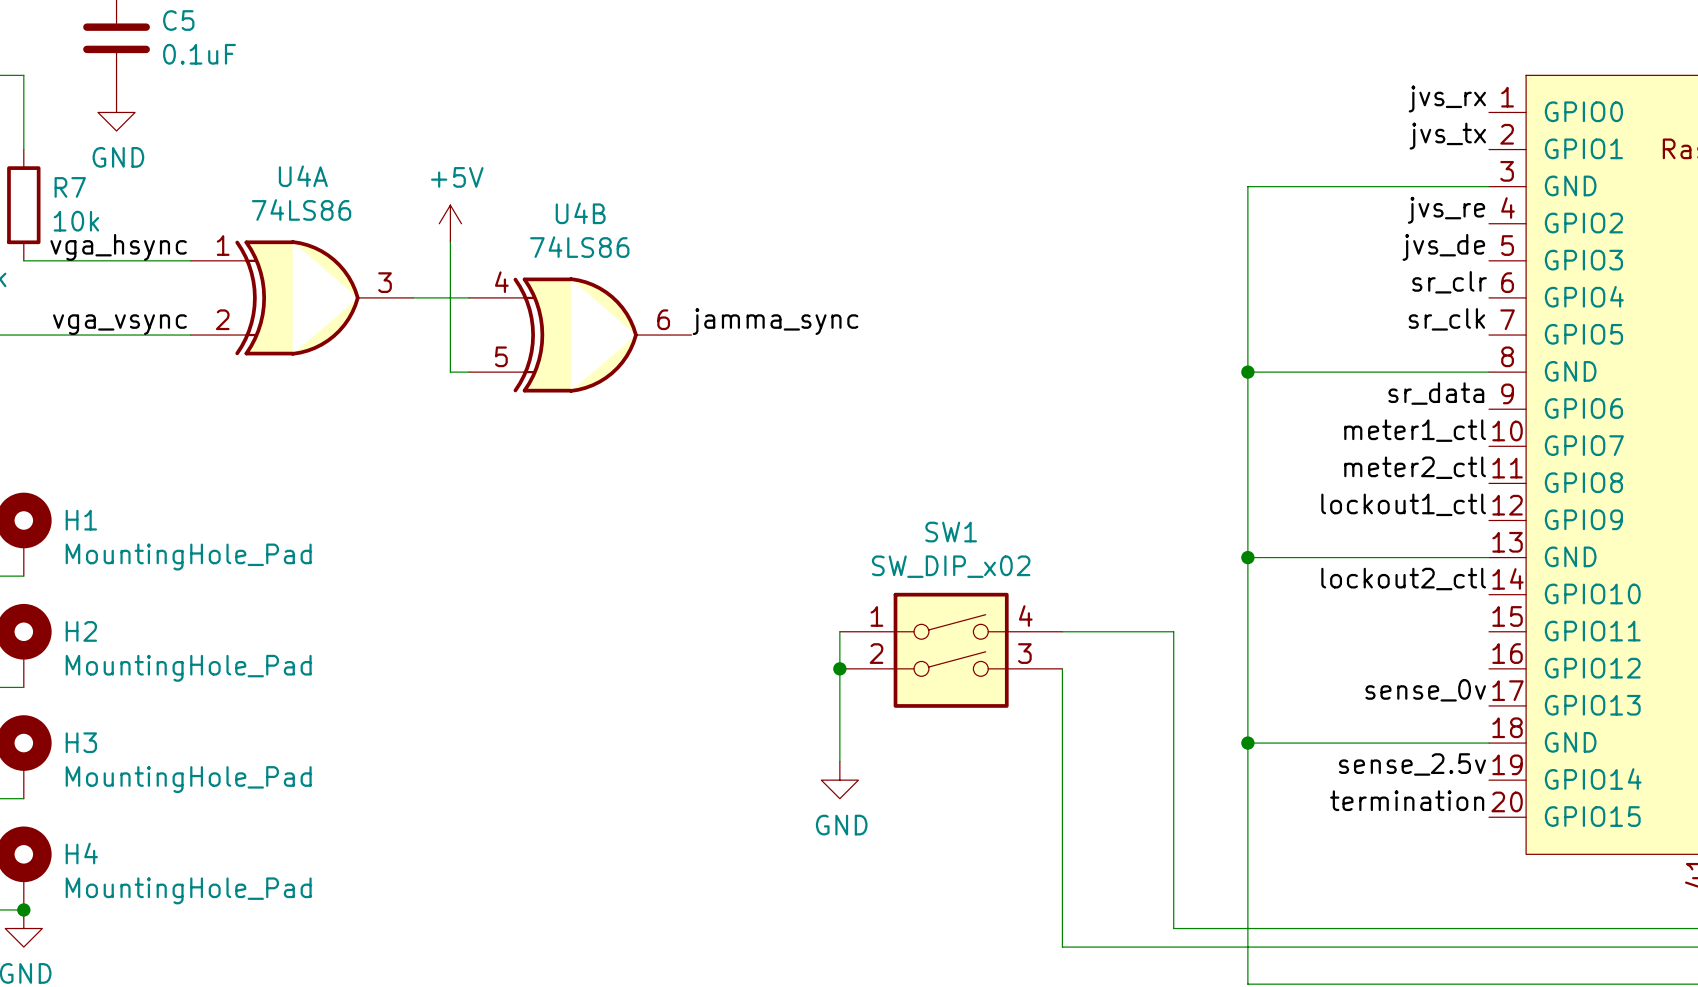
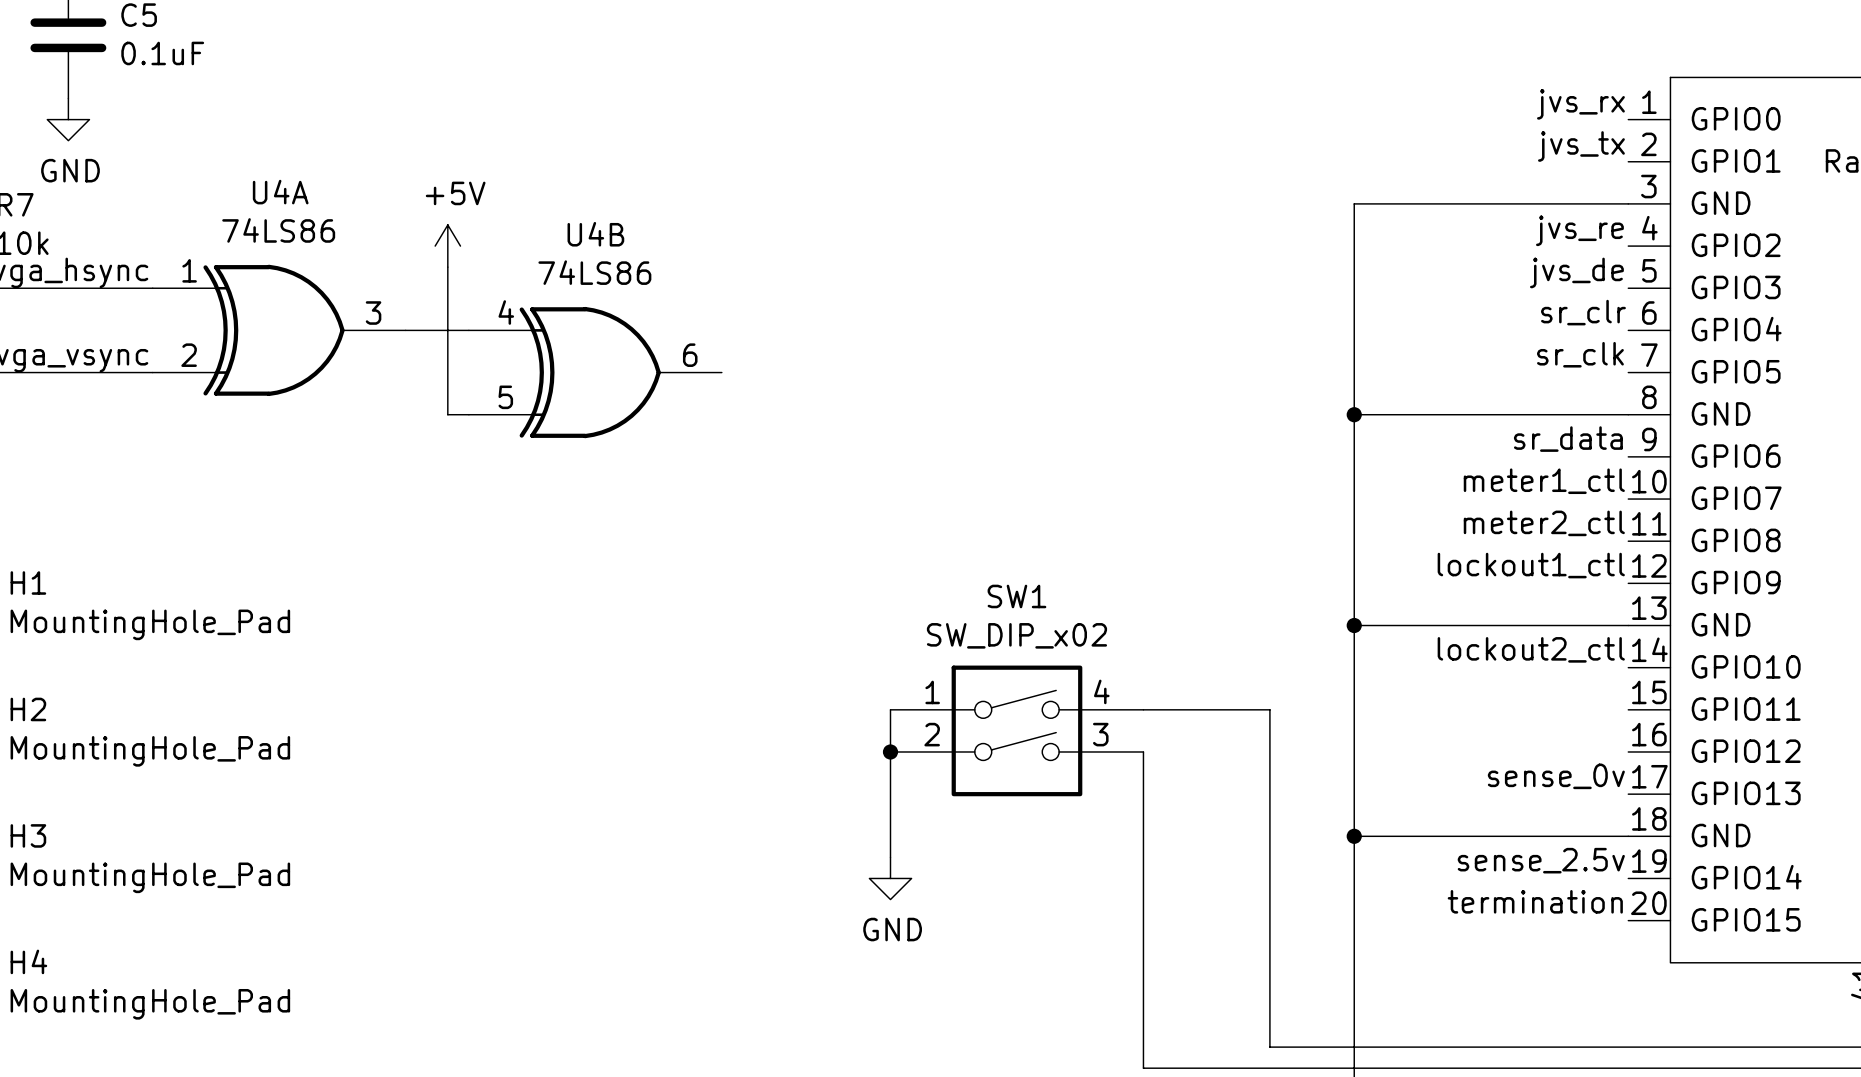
label: jamma_sync (775, 321) -> none

